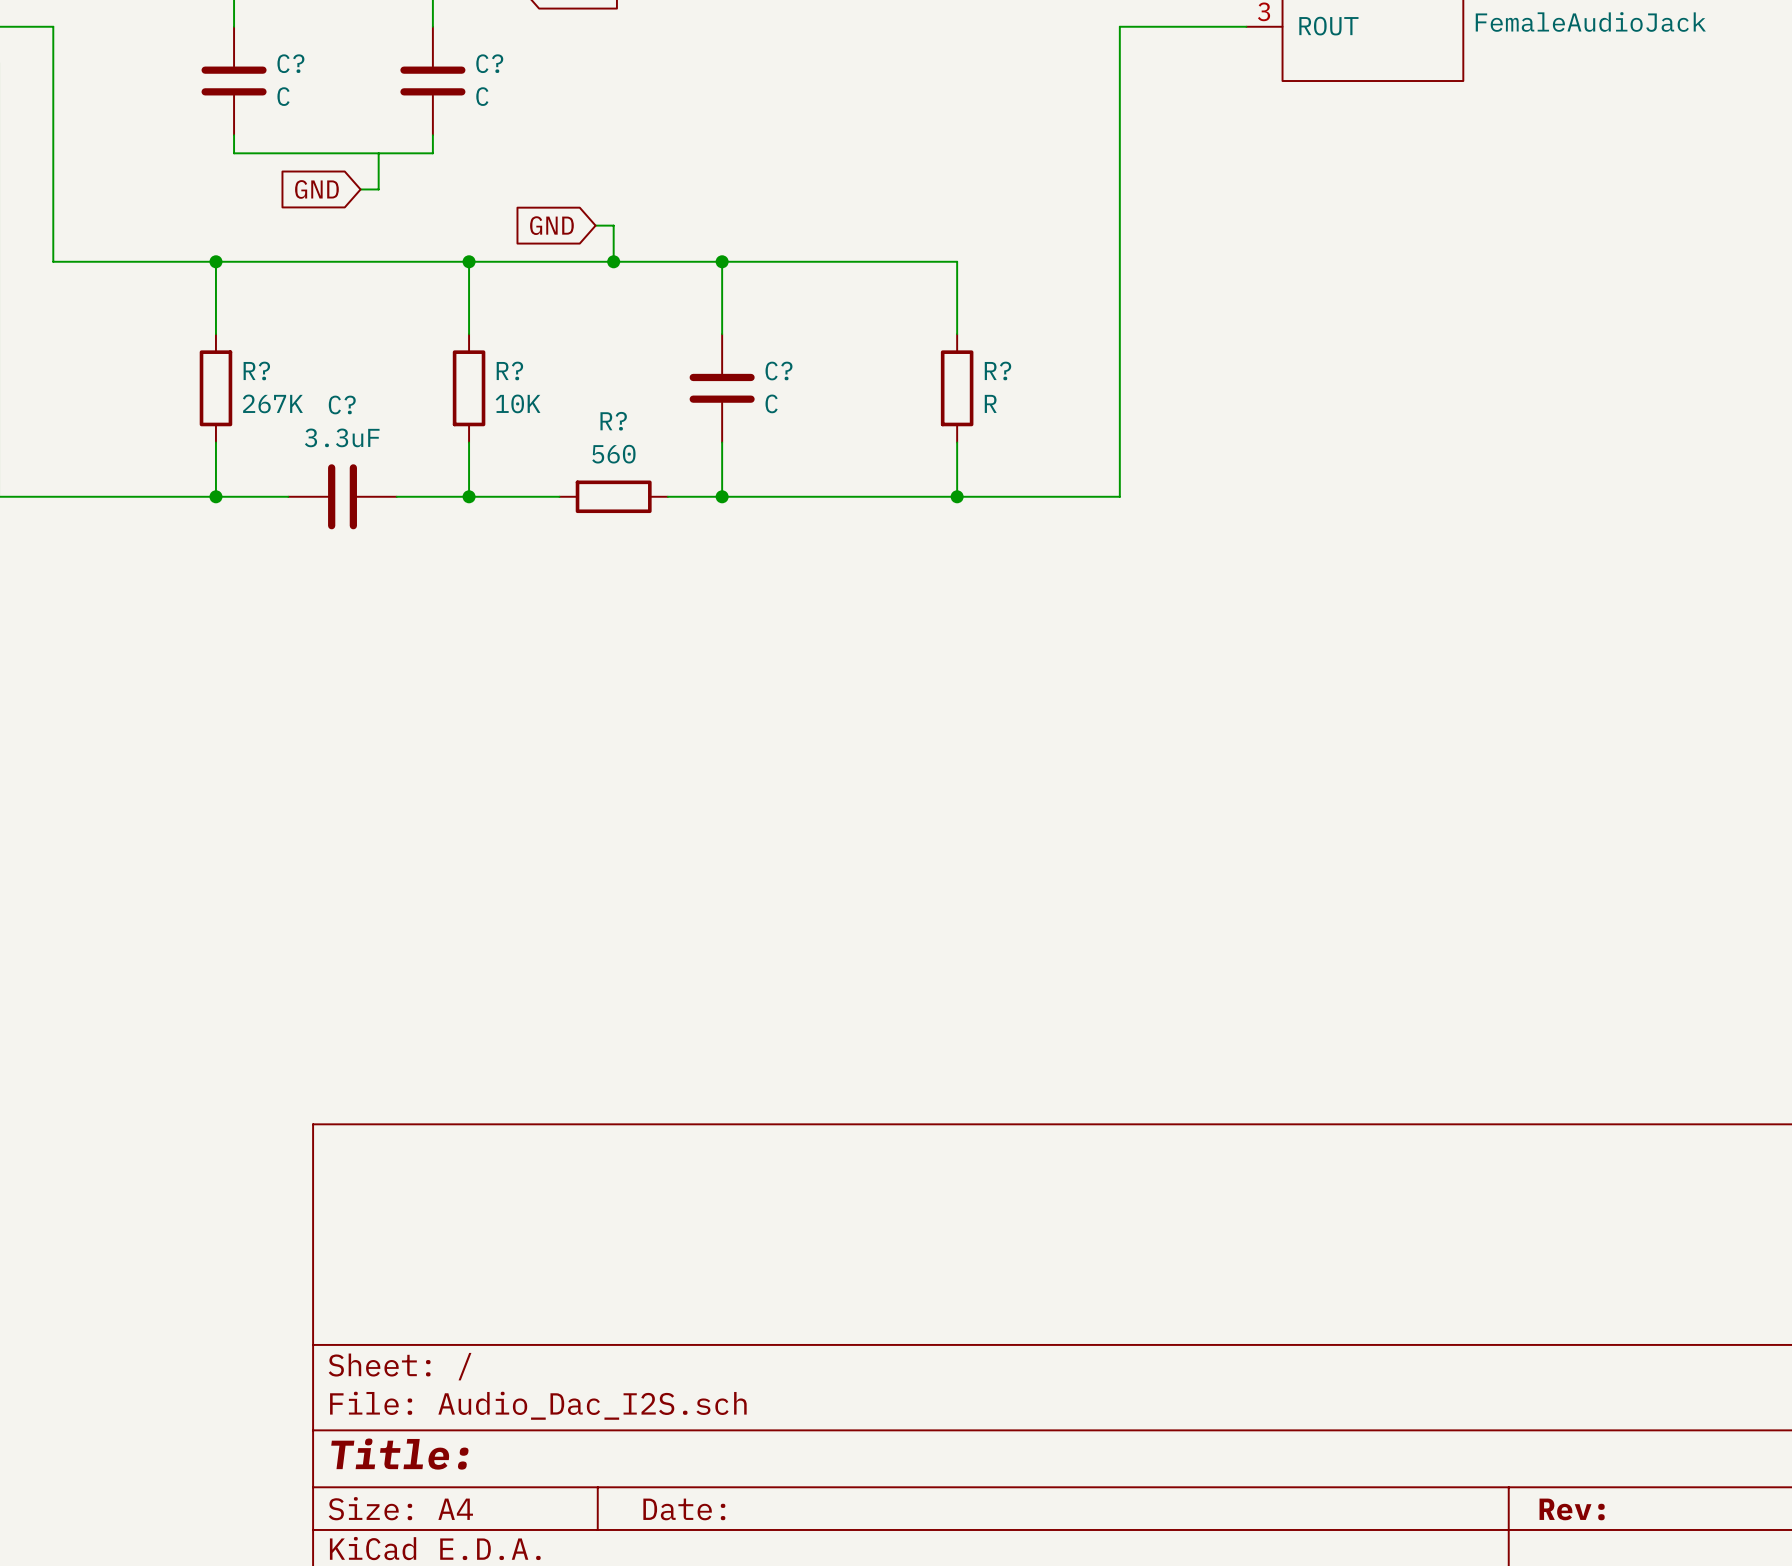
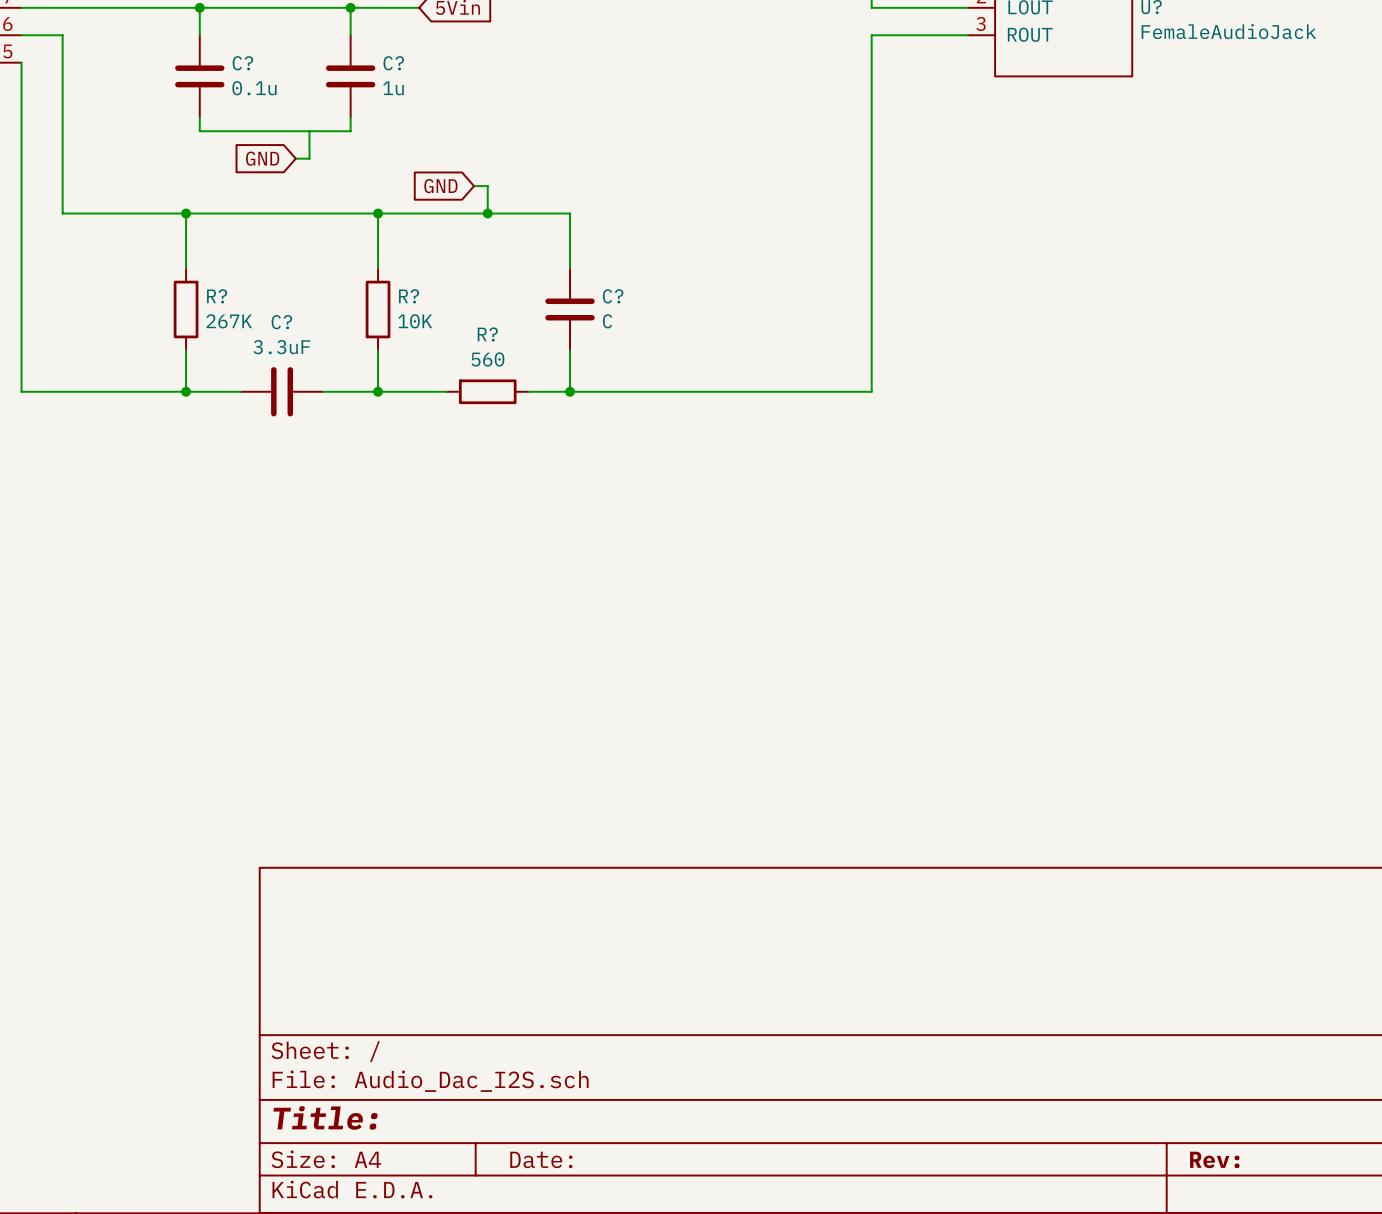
C? value: C (283, 96) -> 0.1u (254, 88)
C? value: C (482, 96) -> 1u (393, 88)
wire: (722, 261) (957, 261) (957, 334) -> none
junction: (722, 261) -> none
R?: R (957, 388) -> none
wire: (957, 442) (957, 496) -> none
junction: (957, 496) -> none

